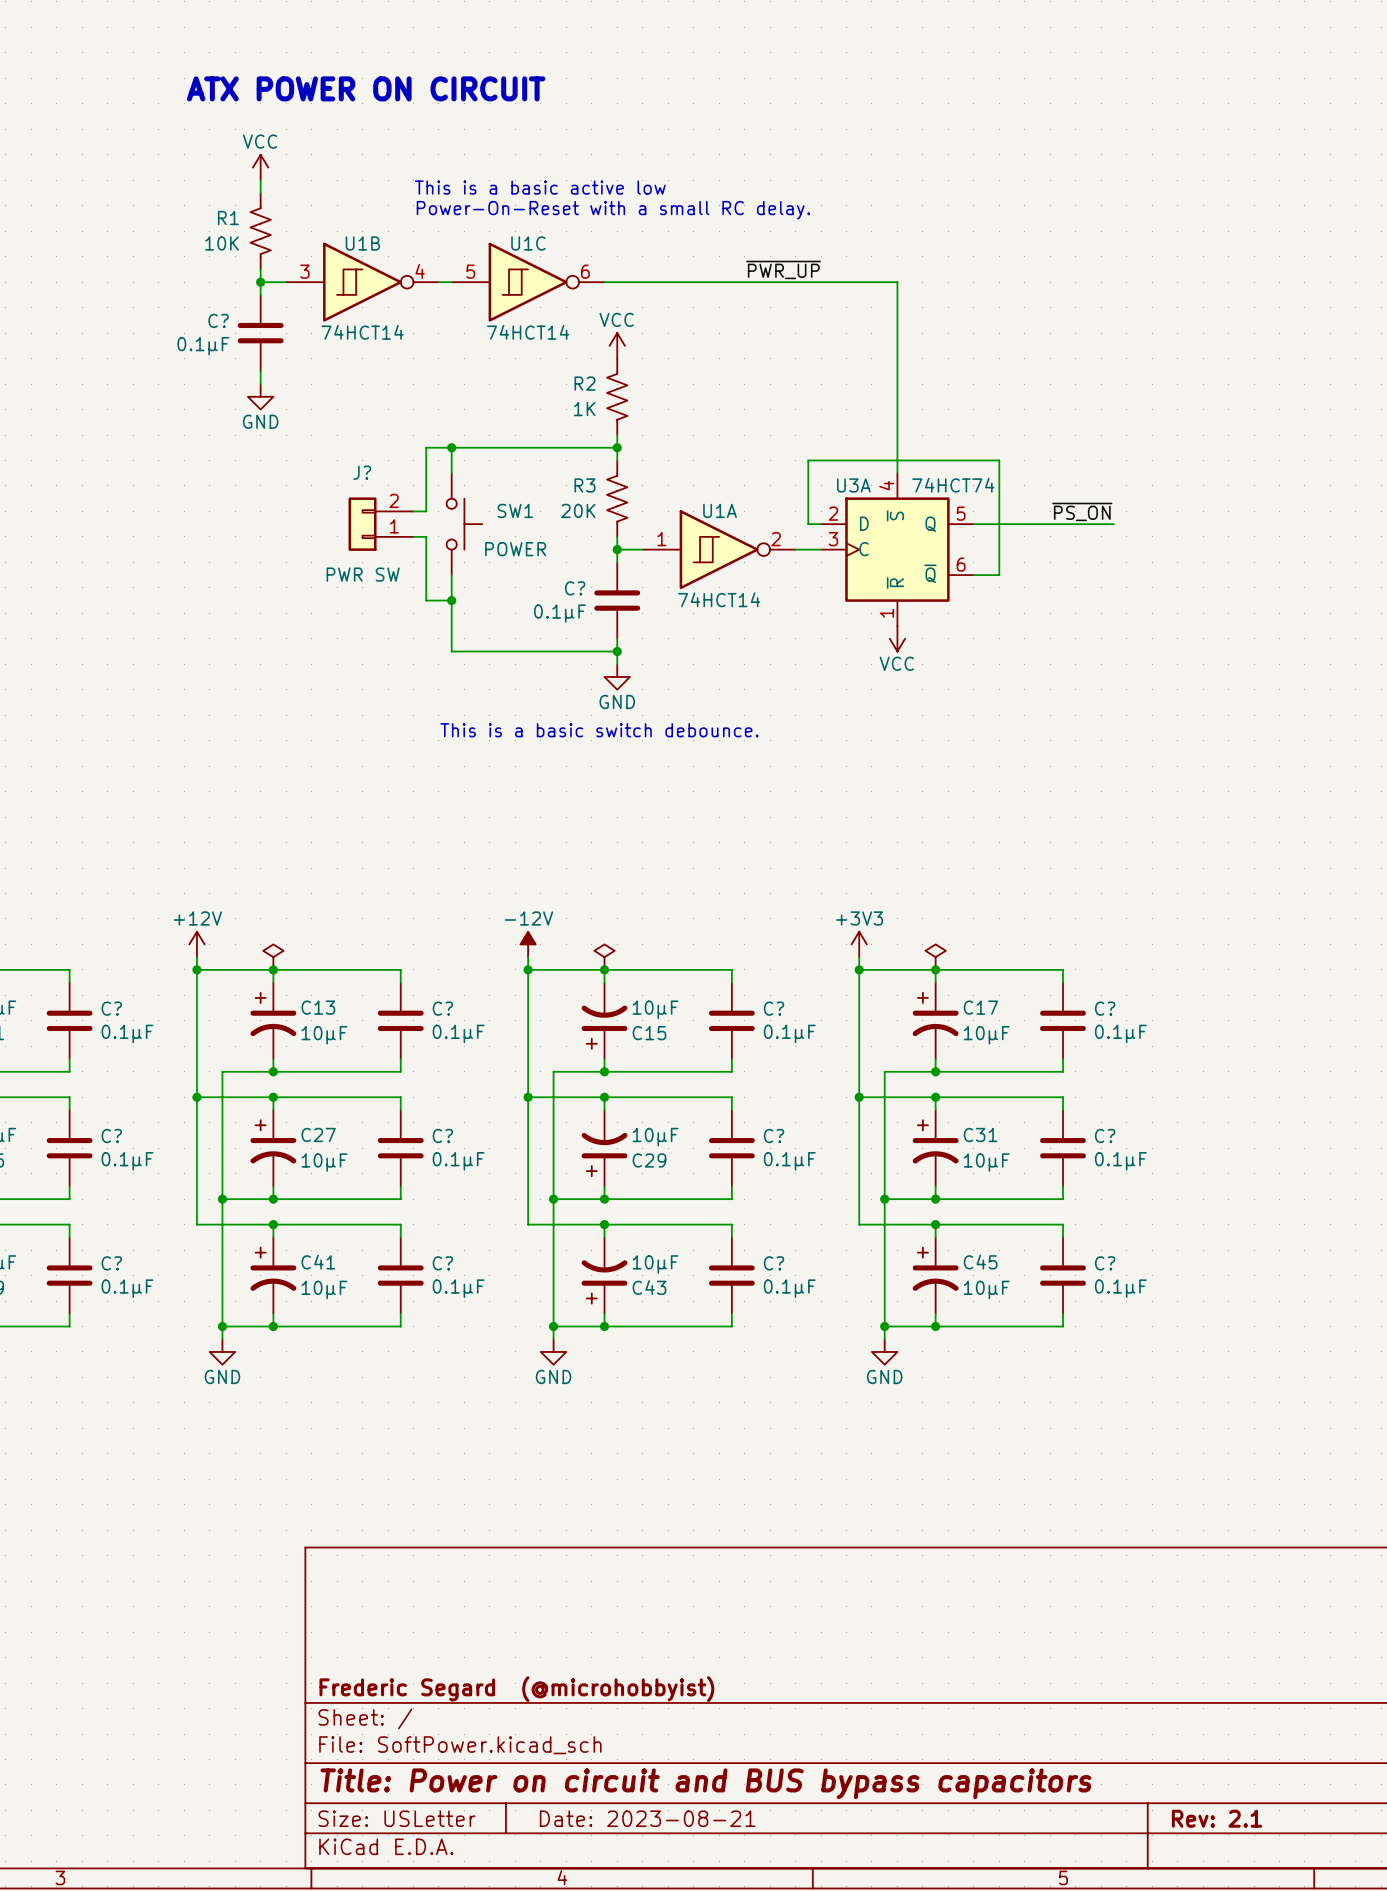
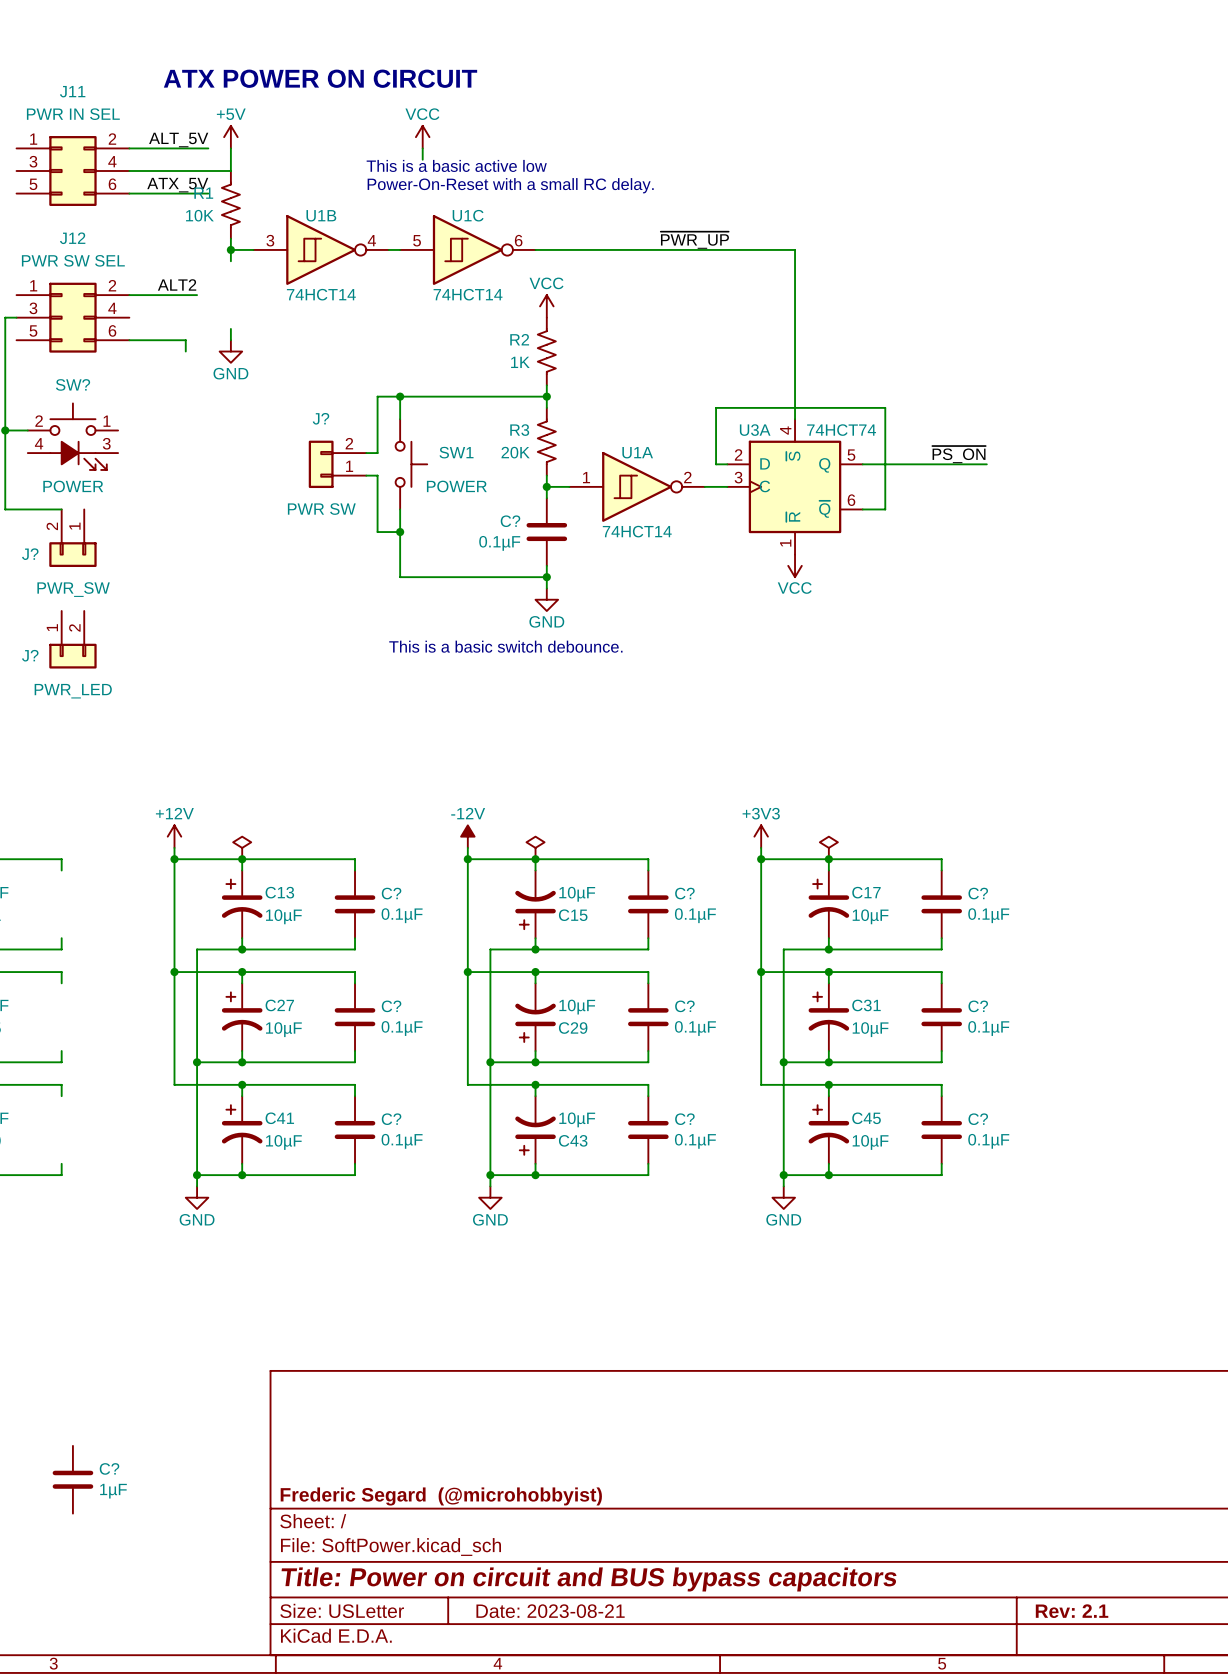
power symbol: none -> +5V (230, 137)
label: none -> ALT_5V (178, 139)
wire: none -> (129, 148) (208, 148)
power symbol position: VCC (260, 167) -> VCC (422, 137)
wire: none -> (422, 148) (422, 159)
J11: none -> PWR IN SEL (72, 170)
wire: none -> (129, 170) (230, 170)
label: none -> ATX_5V (177, 185)
wire: none -> (129, 193) (208, 193)
label: none -> ALT2 (177, 284)
wire: none -> (129, 295) (197, 295)
C?: 0.1µF (260, 333) -> none
wire: none -> (16, 317) (5, 317) (5, 509) (61, 509)
J12: none -> PWR SW SEL (72, 317)
wire: none -> (129, 340) (185, 340) (185, 351)
wire: none -> (5, 430) (27, 430)
junction: none -> (5, 430)
SW?: none -> POWER (72, 436)
J?: none -> PWR_SW (72, 538)
J?: none -> PWR_LED (72, 639)
C?: 0.1µF (69, 1020) -> none
C?: 0.1µF (69, 1148) -> none
C?: 0.1µF (69, 1275) -> none
C?: none -> 1µF (72, 1479)

